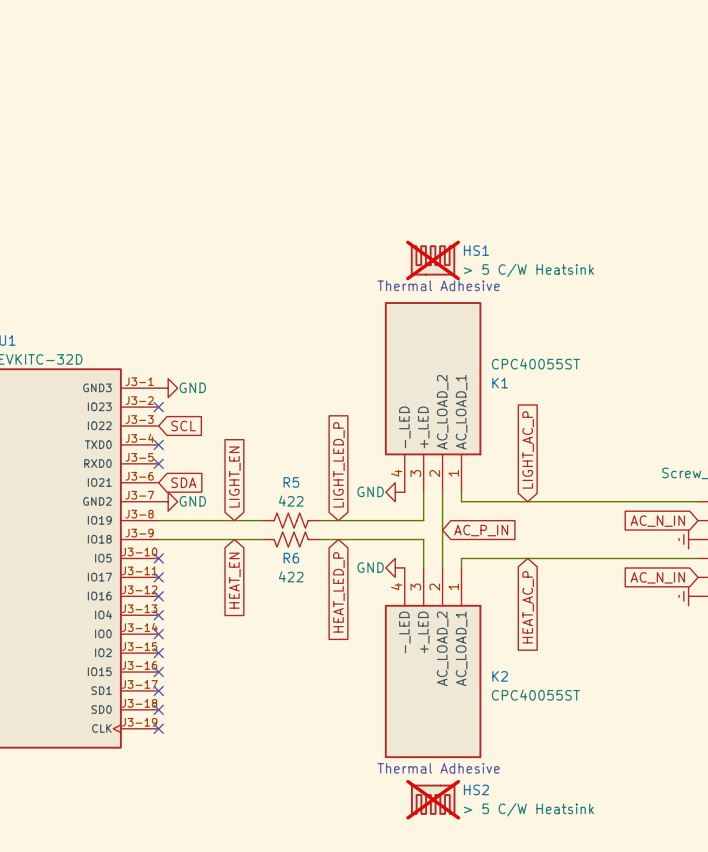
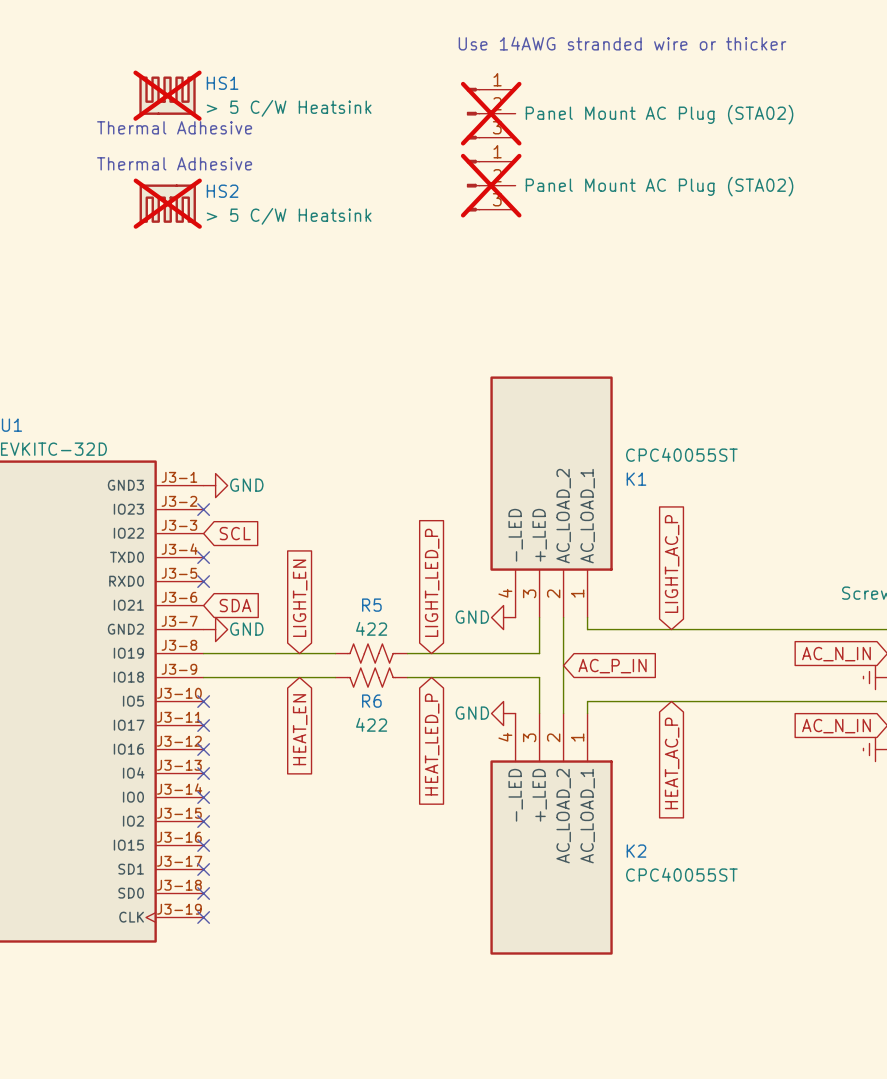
text: none -> Use 14AWG stranded wire or thicker (622, 43)
part: none -> Panel Mount AC Plug (STA02) (491, 113)
text: none -> Thermal Adhesive (174, 127)
text: none -> Thermal Adhesive (174, 163)
part: none -> Panel Mount AC Plug (STA02) (491, 185)
HS1 position: (433, 260) -> (167, 95)
text: Thermal Adhesive (438, 285) -> none
text: Thermal Adhesive (438, 768) -> none
HS2 position: (433, 799) -> (167, 203)

